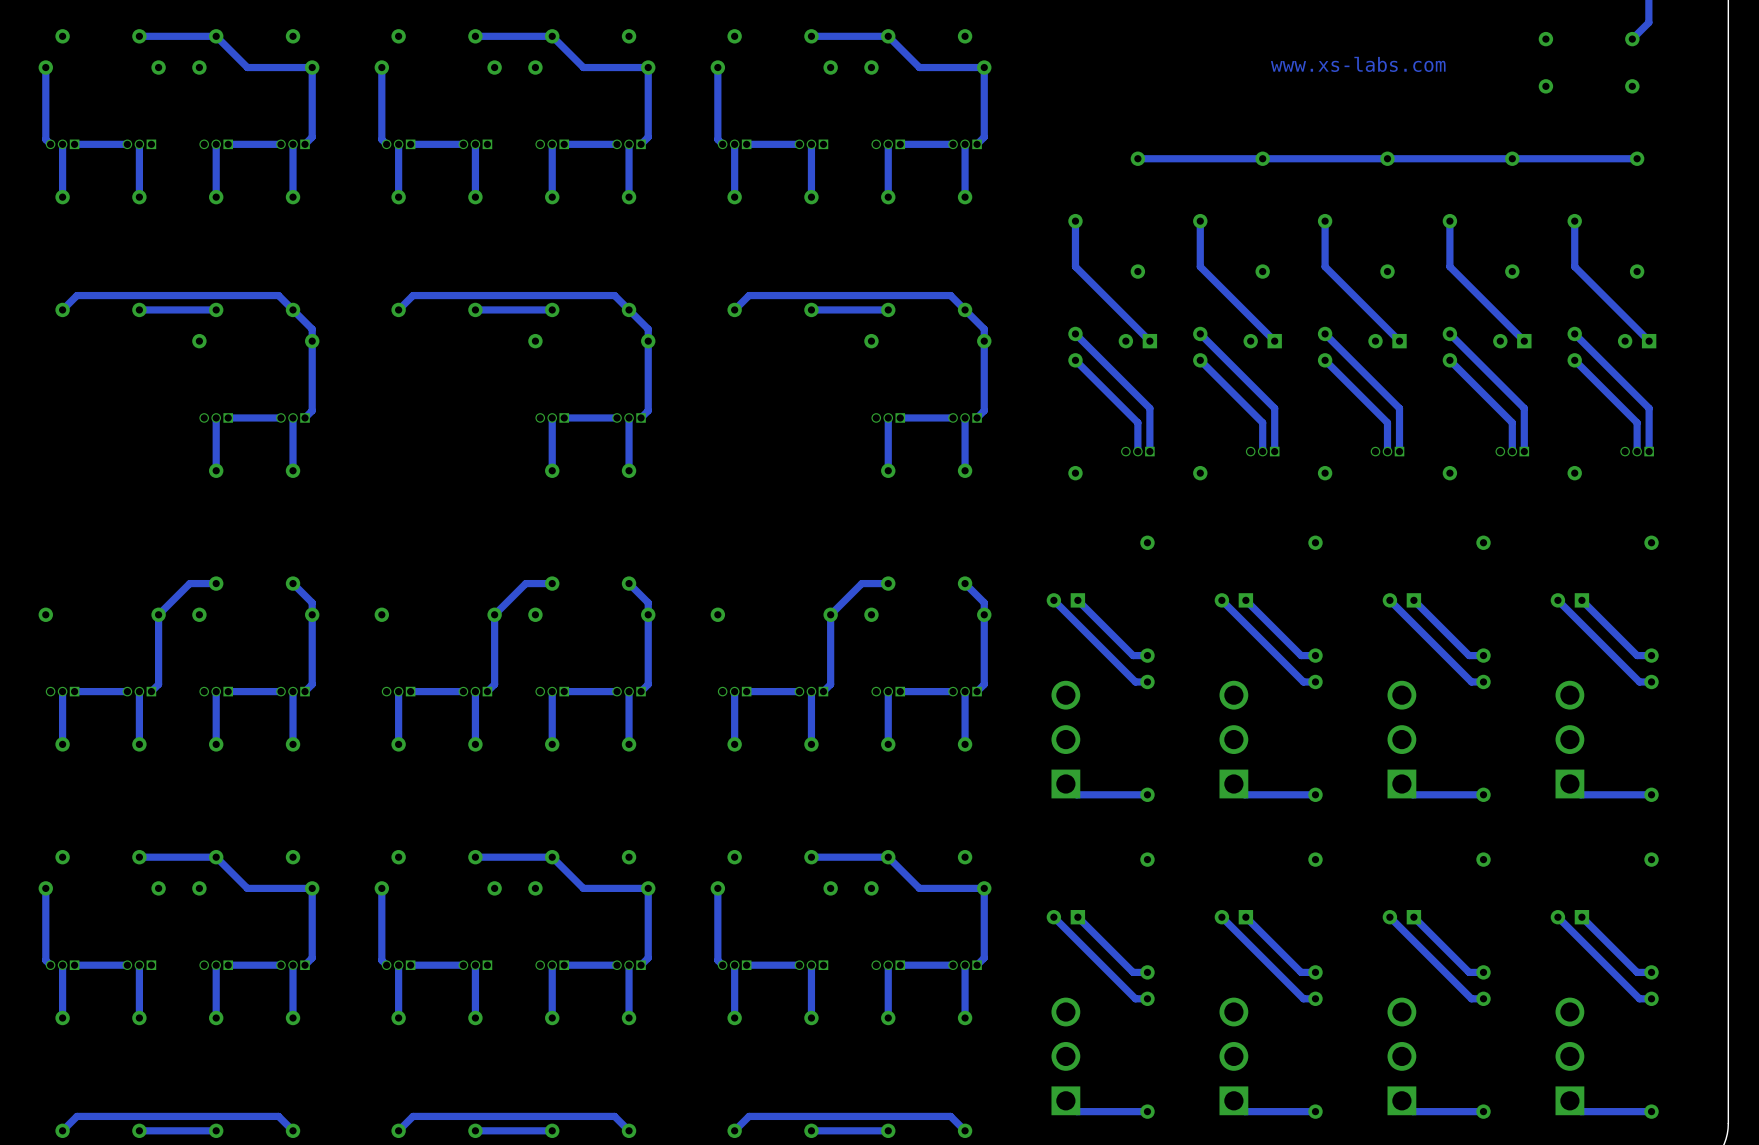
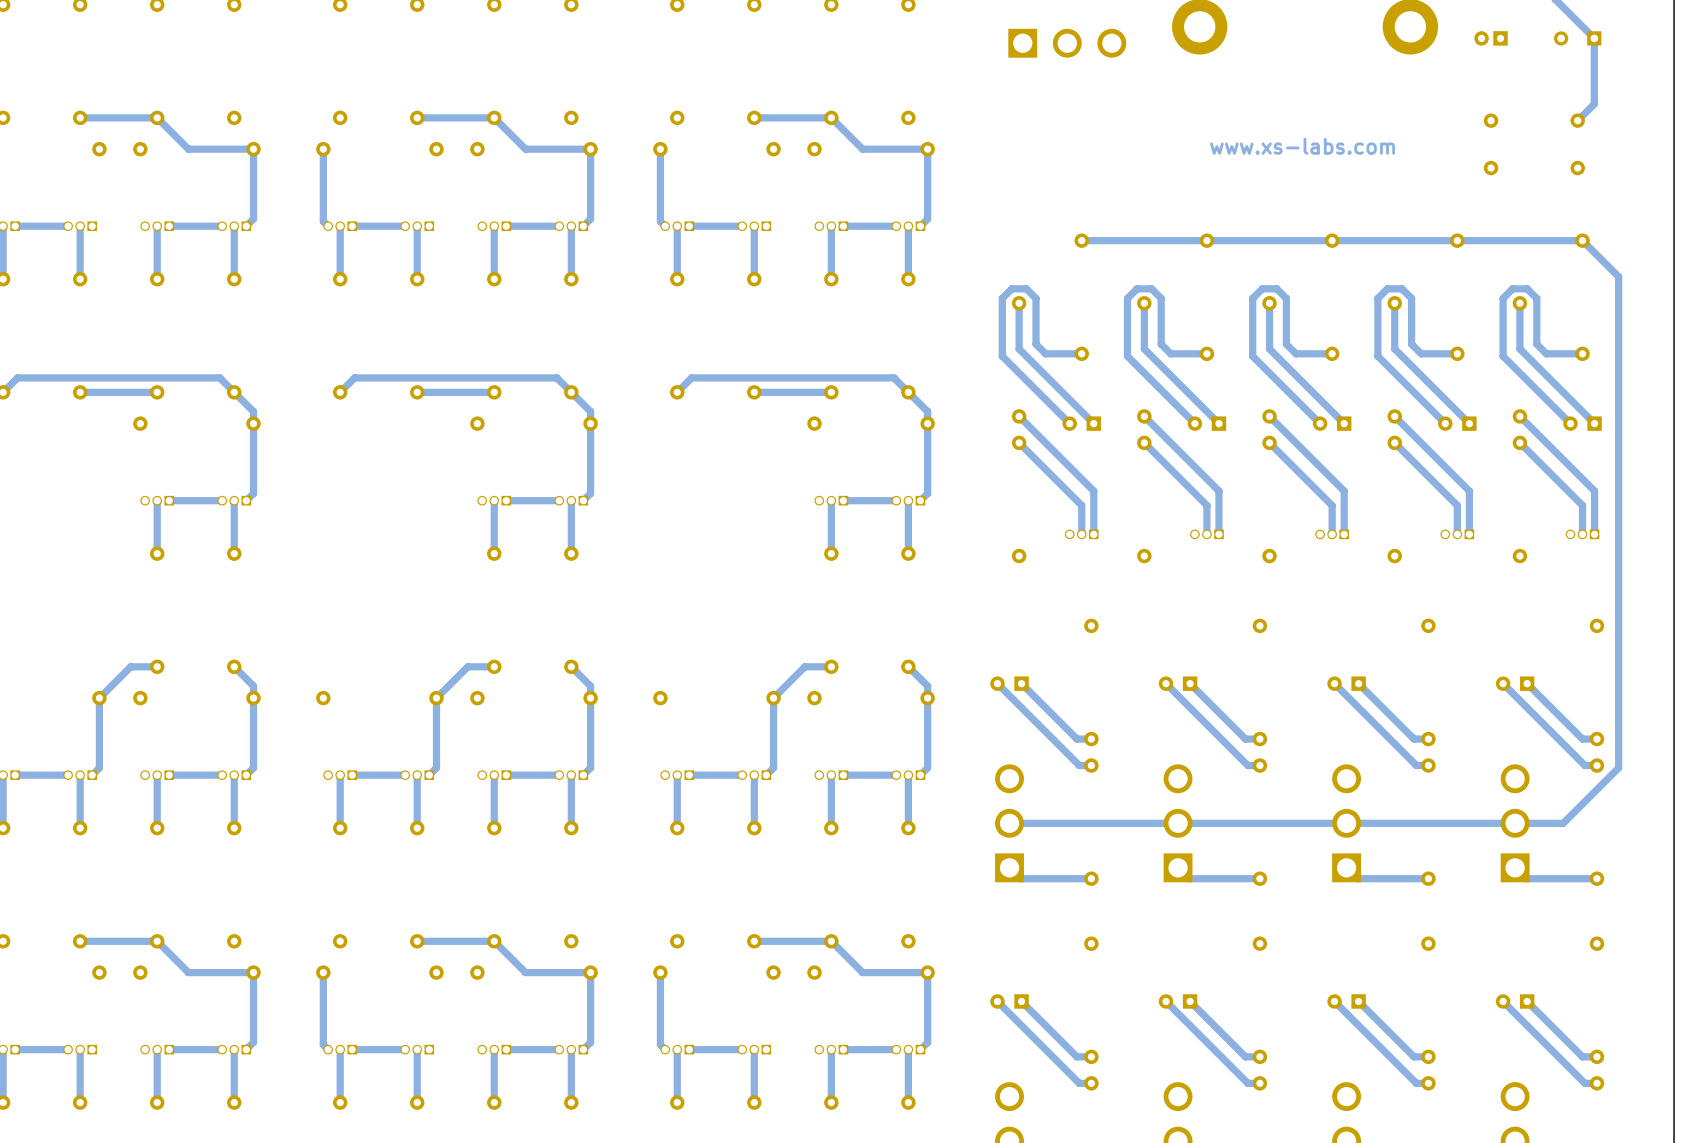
track: none -> (1582, 240) (1618, 276) (1618, 767) (1563, 823) (1009, 823)
track: none -> (1081, 353) (1045, 353) (1036, 344) (1036, 298) (1026, 288) (1011, 288) (1002, 298) (1002, 356) (1069, 423)
track: none -> (1206, 353) (1170, 353) (1161, 344) (1161, 298) (1151, 288) (1137, 288) (1127, 298) (1127, 356) (1194, 423)
track: none -> (1332, 353) (1296, 353) (1286, 344) (1286, 298) (1276, 288) (1262, 288) (1252, 298) (1252, 356) (1320, 423)
track: none -> (1457, 353) (1421, 353) (1411, 344) (1411, 298) (1401, 288) (1387, 288) (1377, 298) (1377, 356) (1445, 423)
track: none -> (1582, 353) (1546, 353) (1536, 344) (1536, 298) (1527, 288) (1512, 288) (1503, 298) (1503, 356) (1570, 423)

